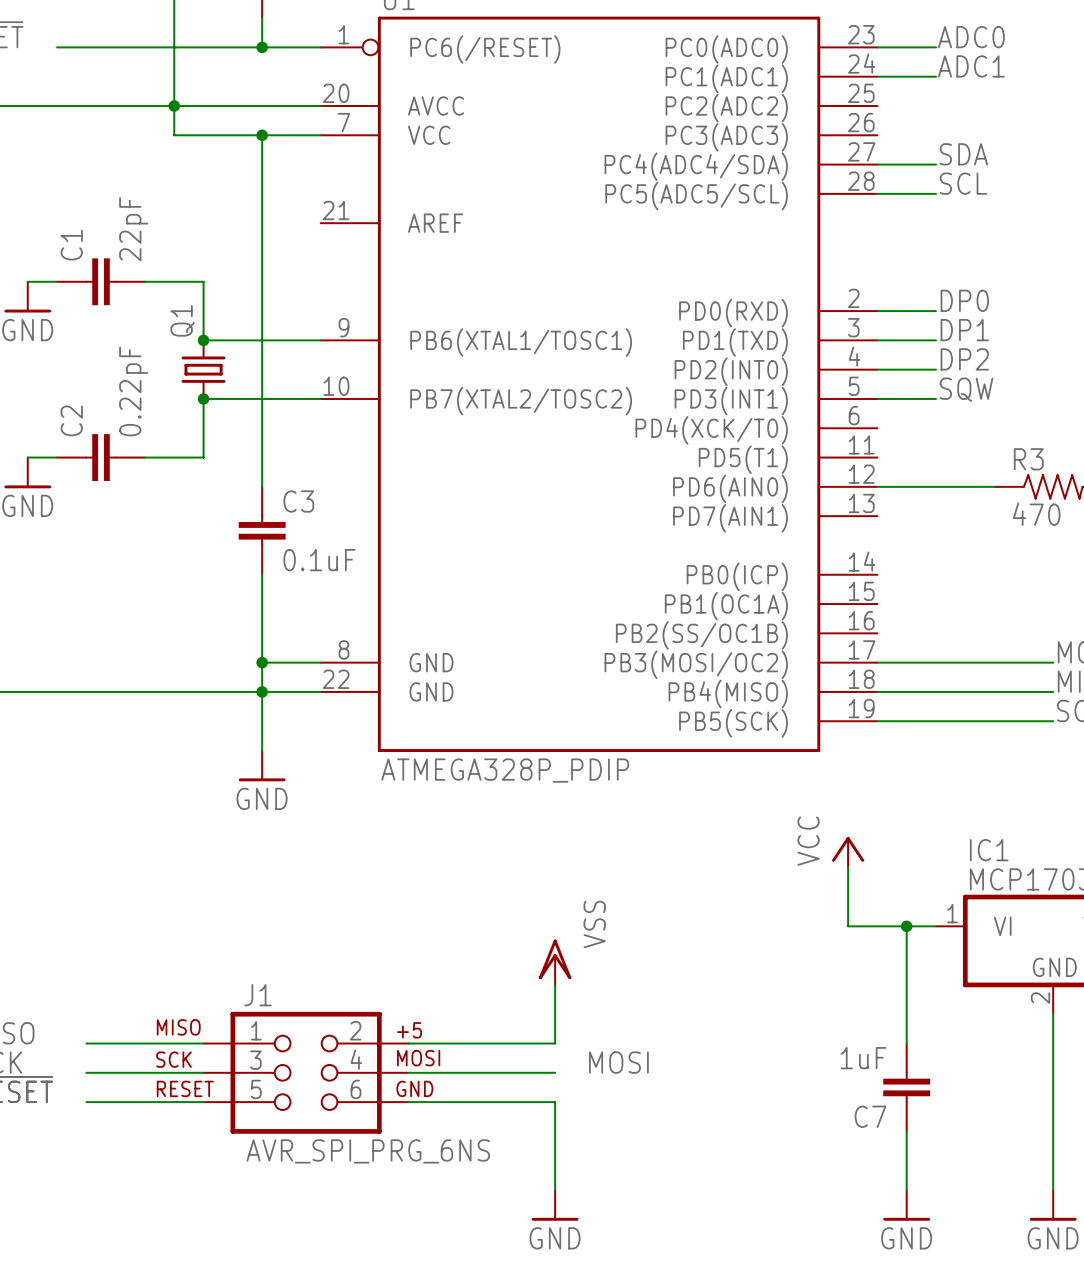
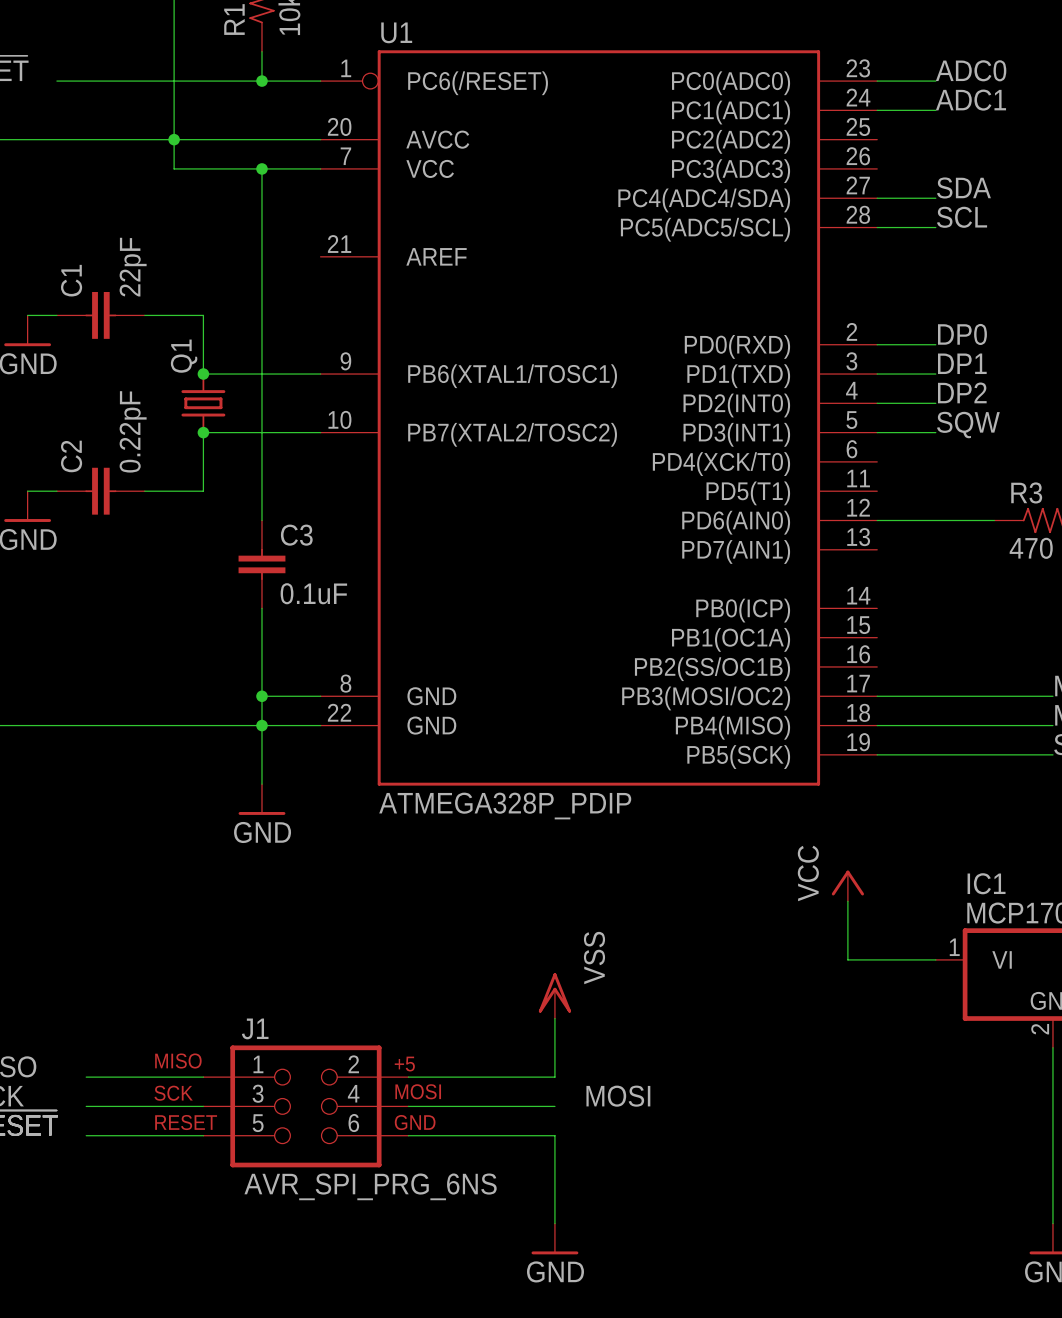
wire: (906, 926) (906, 1043) -> none
junction: (906, 926) -> none
C7: 1uF (906, 1087) -> none
wire: (906, 1131) (906, 1190) -> none
power symbol: GND (906, 1205) -> none

